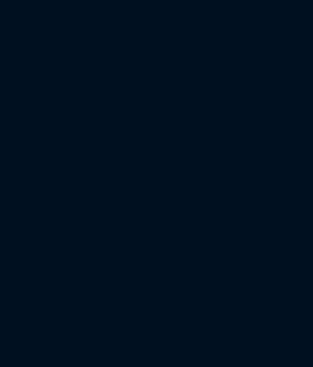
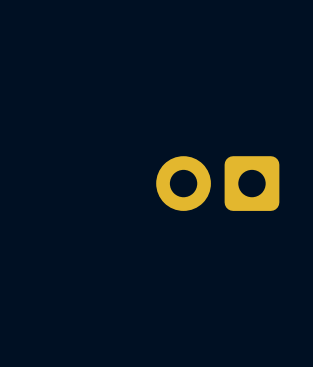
part: none -> (217, 183)

